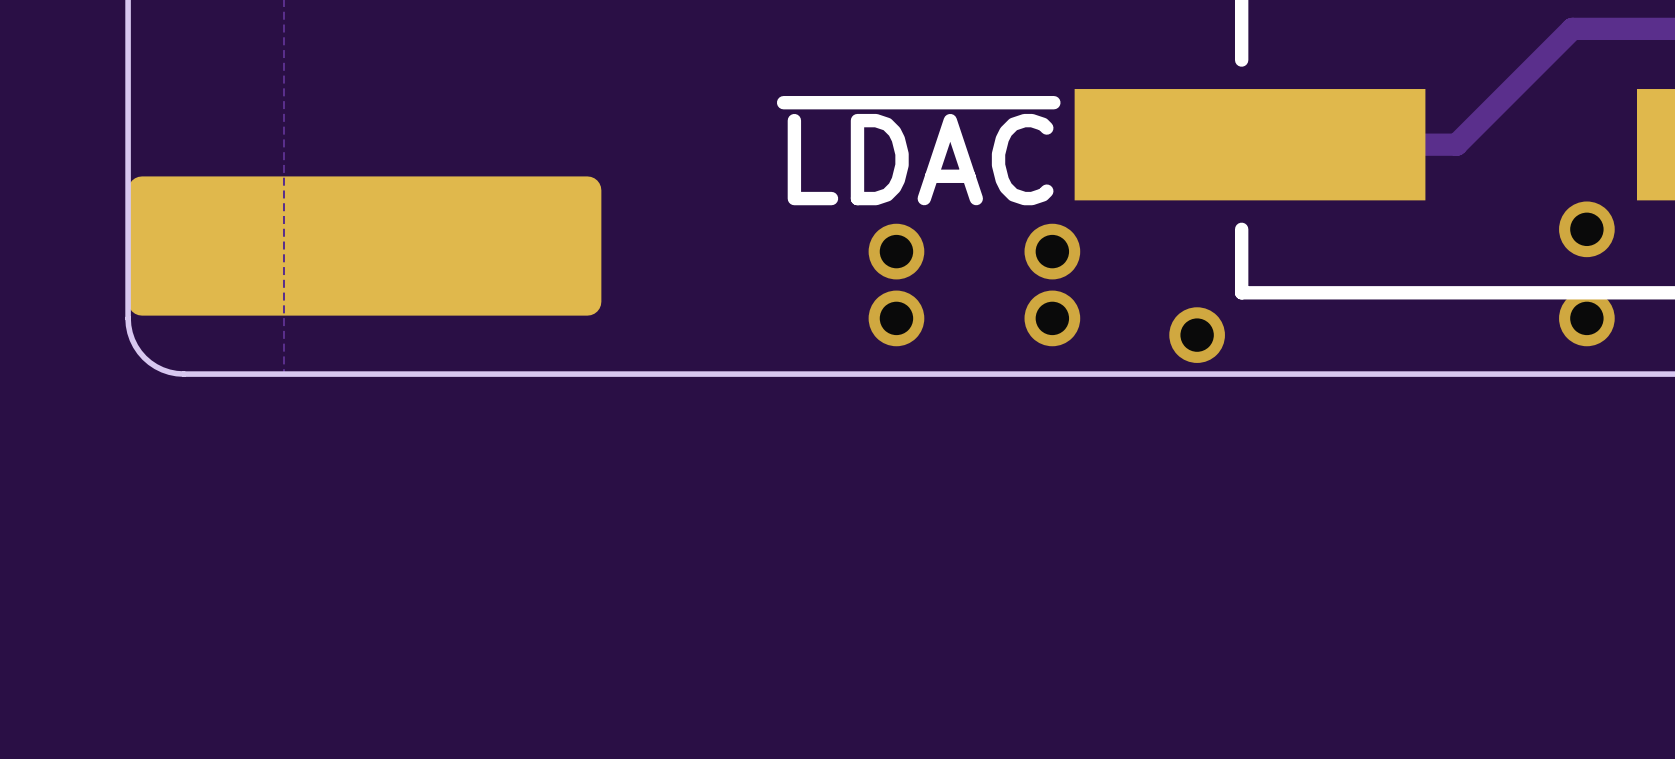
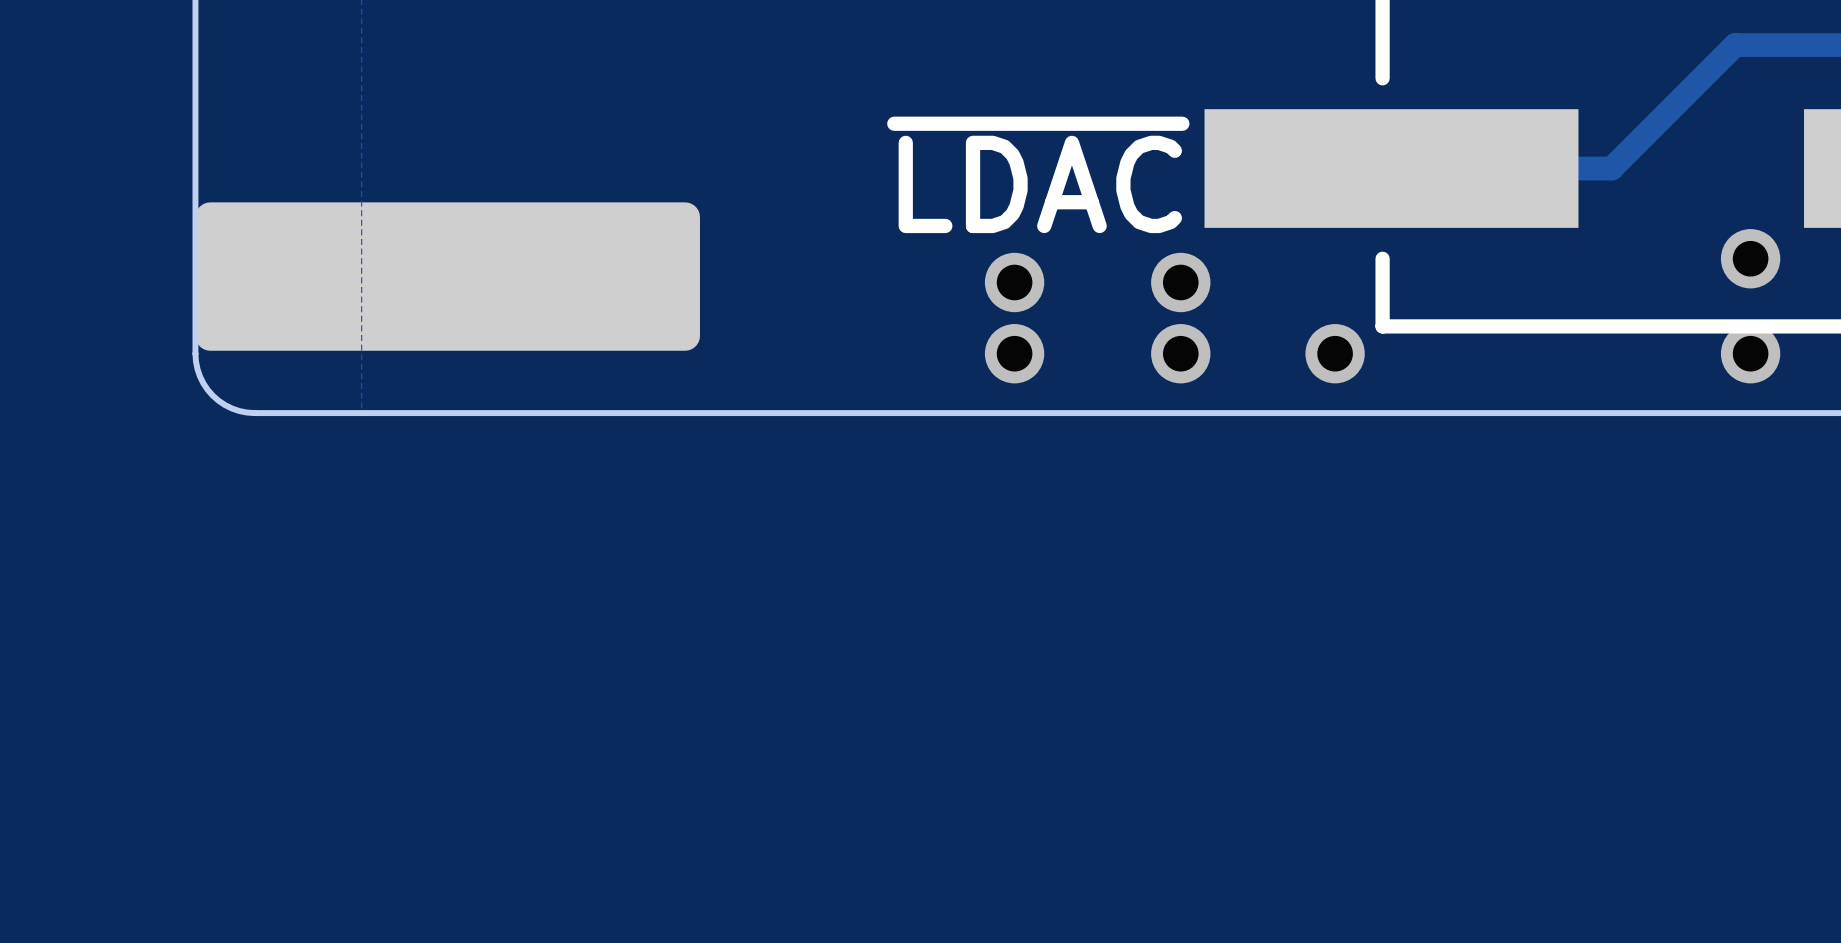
via position: (1197, 335) -> (1335, 353)

